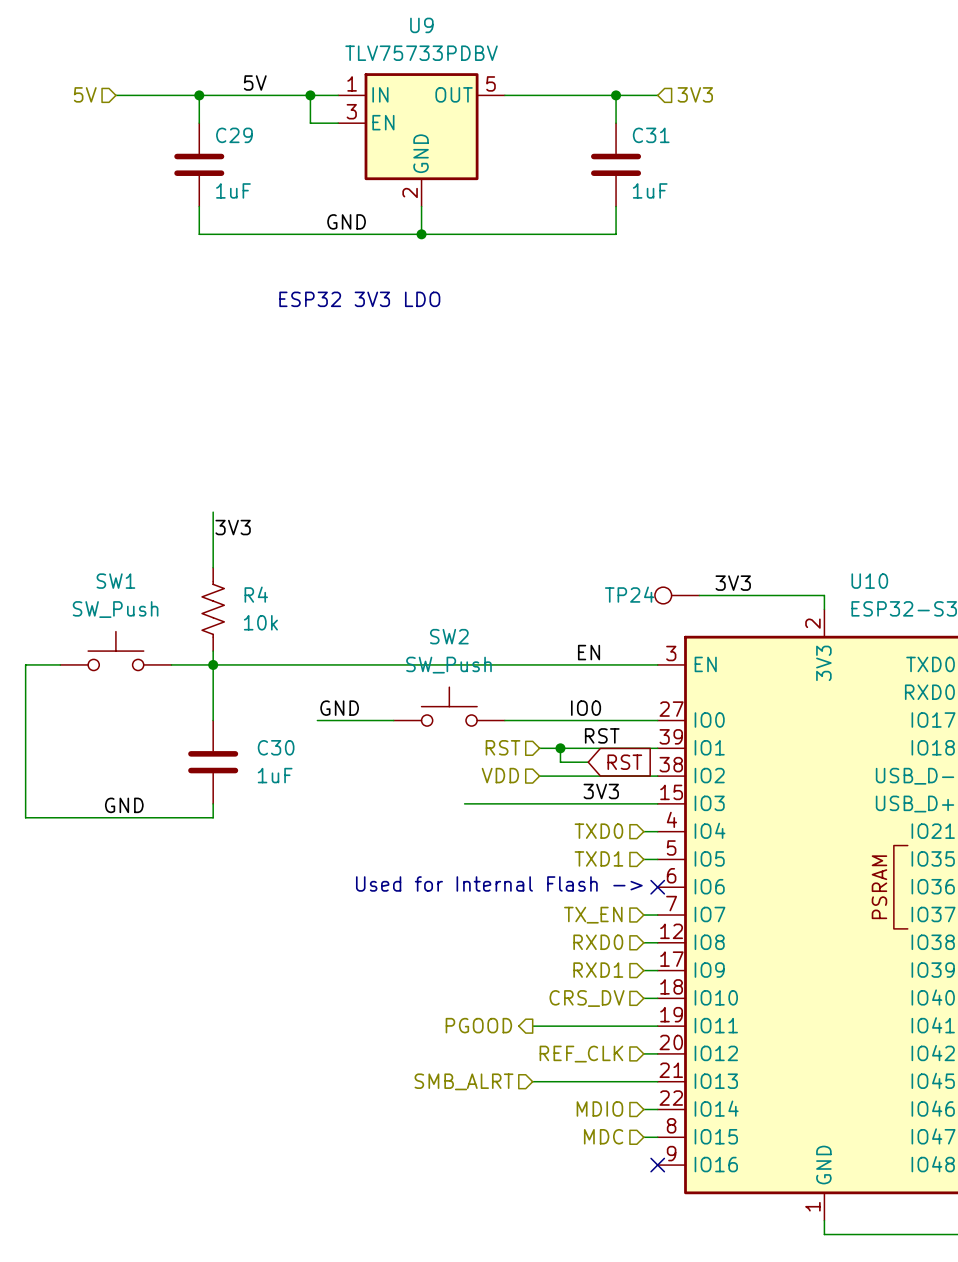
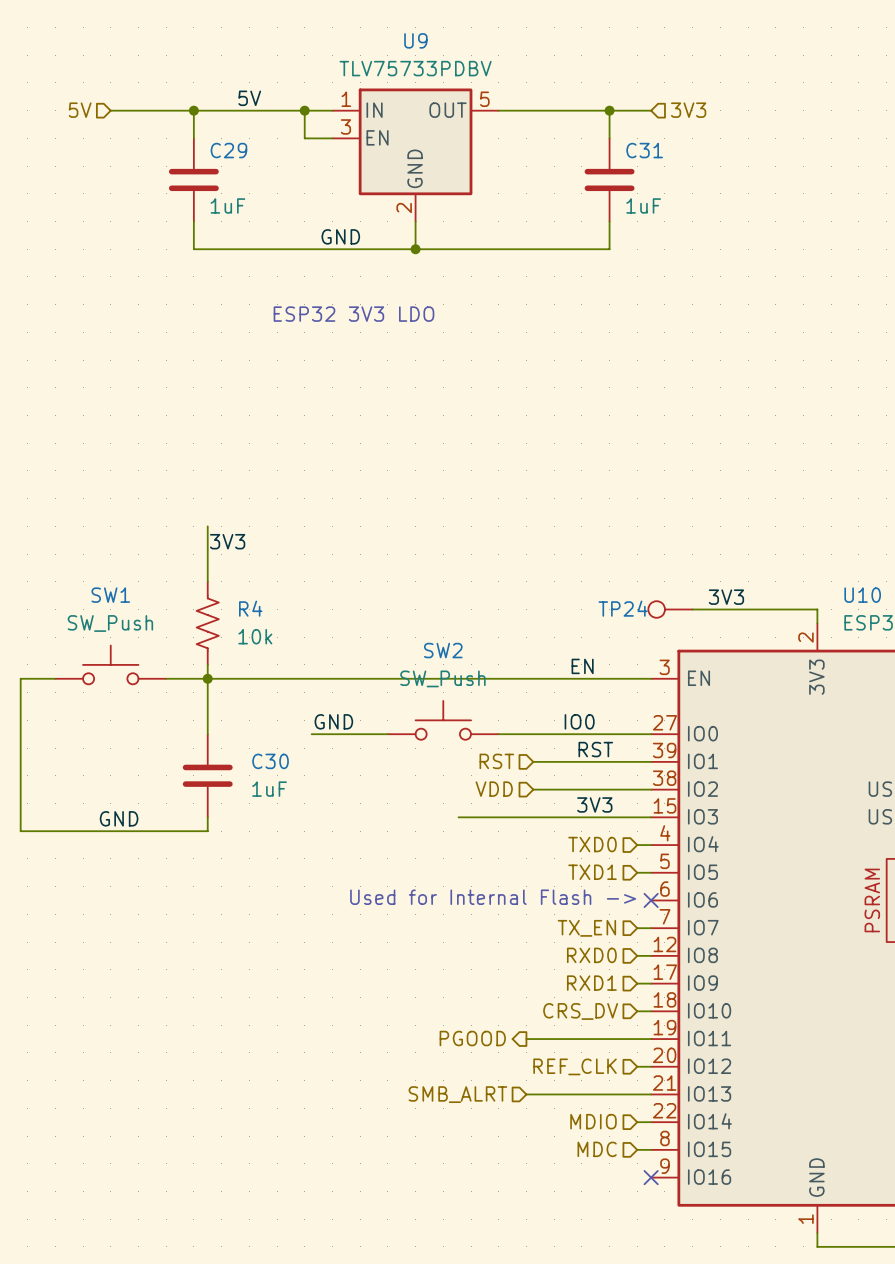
wire: (560, 748) (560, 762) (588, 762) -> none
junction: (560, 748) -> none
global label: RST (624, 762) -> none

